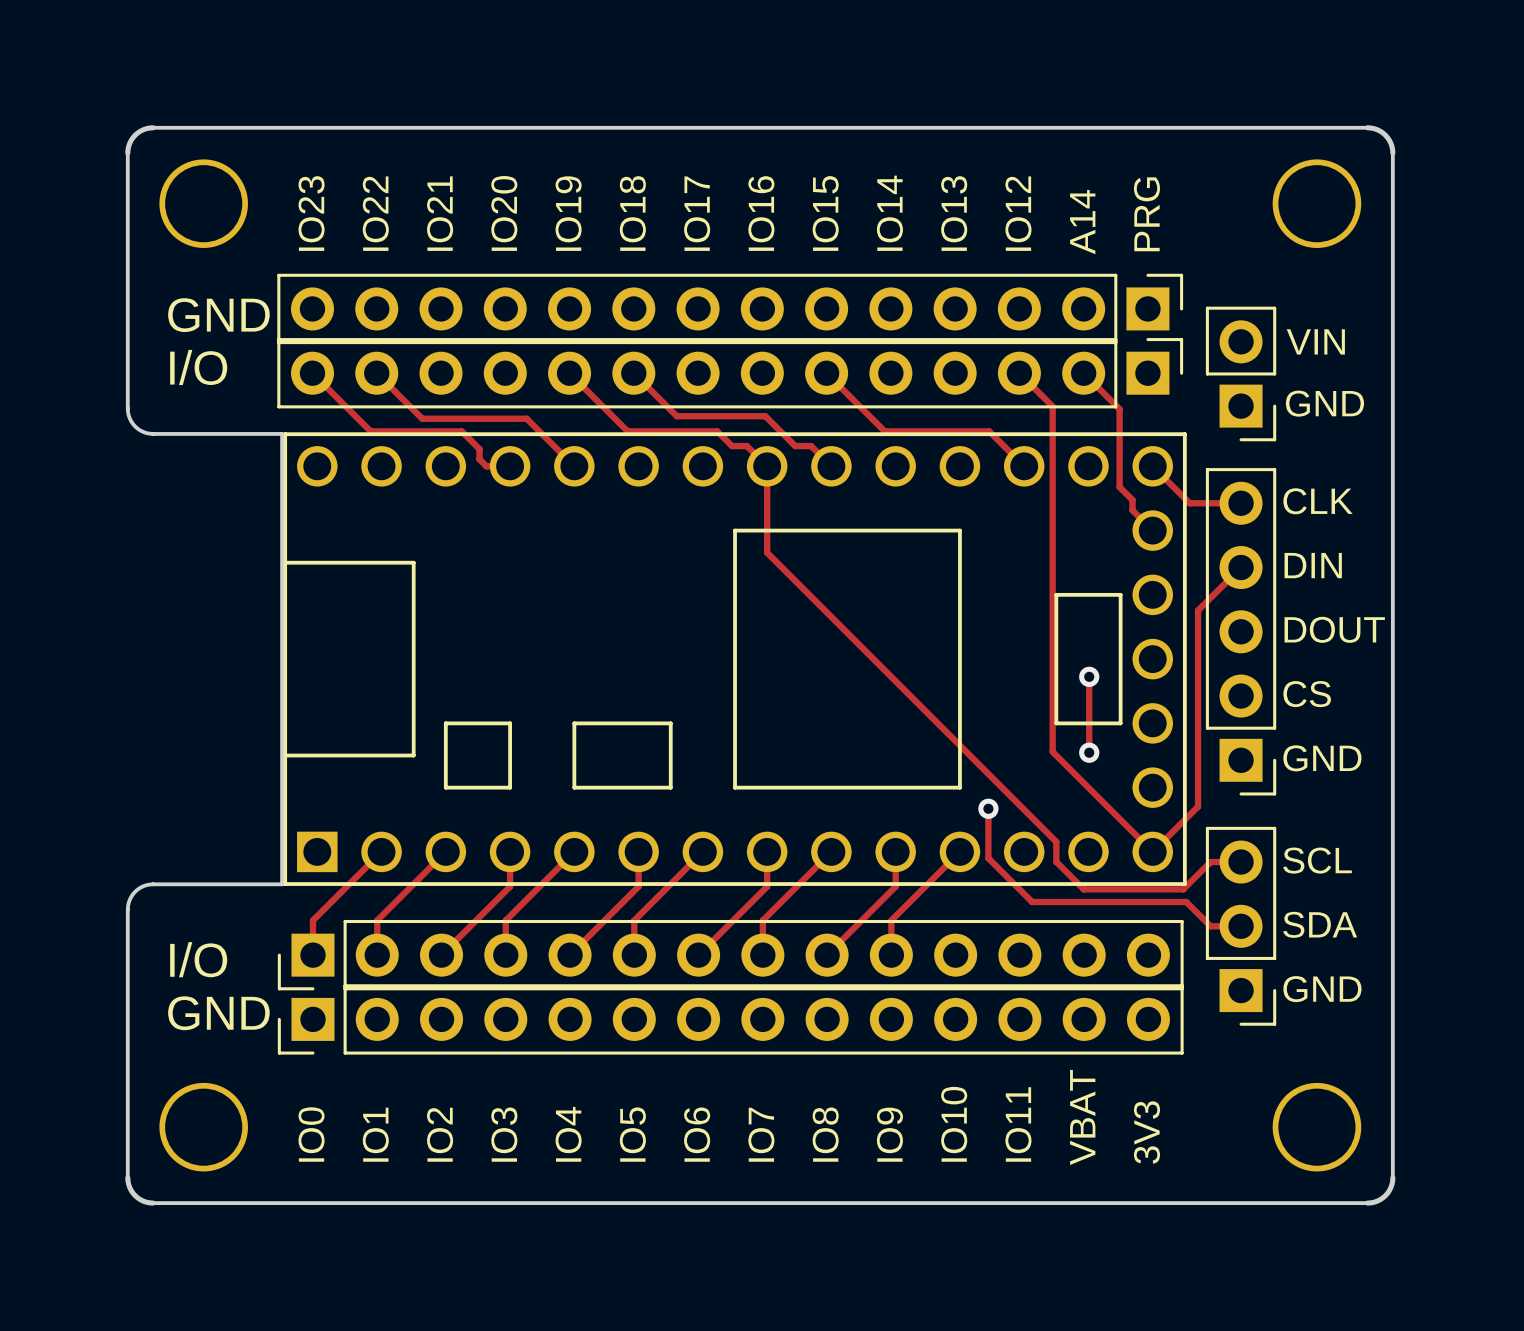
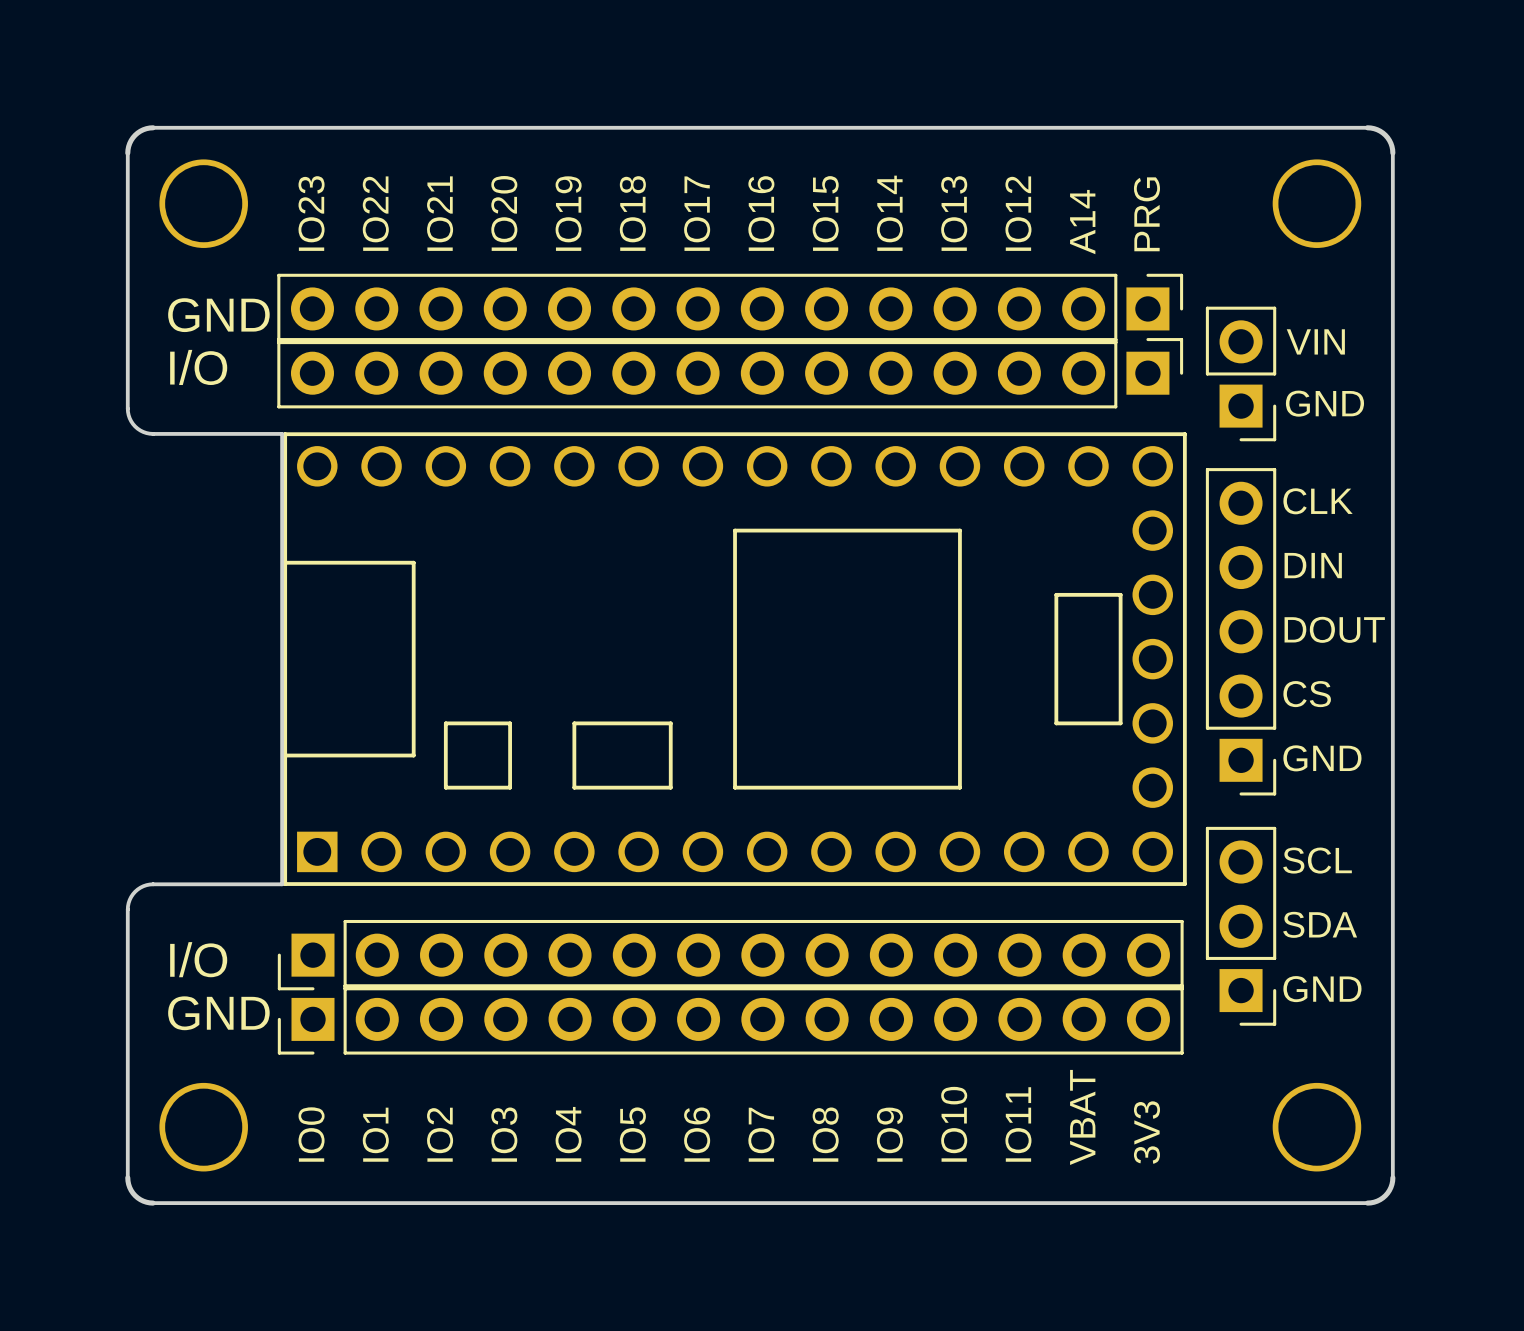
track: (312, 373) (370, 431) (461, 431) (479, 449) (479, 459) (486, 466) (510, 466) -> none
track: (376, 373) (422, 418) (526, 418) (574, 466) -> none
track: (569, 373) (627, 431) (717, 431) (731, 446) (746, 446) (767, 466) (767, 552) (1056, 841) (1056, 861) (1083, 889) (1183, 889) (1210, 862) (1241, 862) -> none
track: (633, 373) (676, 416) (765, 416) (795, 446) (811, 446) (831, 466) -> none
track: (826, 373) (884, 431) (989, 431) (1024, 466) -> none
track: (1019, 373) (1052, 406) (1052, 751) (1152, 851) (1198, 806) (1198, 610) (1241, 567) -> none
track: (1083, 373) (1119, 409) (1119, 487) (1132, 499) (1132, 510) (1152, 530) -> none
track: (1152, 466) (1189, 503) (1241, 503) -> none
track: (1089, 676) (1089, 752) -> none
via: (1089, 676) -> none
via: (1089, 752) -> none
track: (988, 808) (988, 858) (1032, 902) (1186, 902) (1210, 926) (1241, 926) -> none
via: (988, 808) -> none
track: (381, 851) (312, 920) (312, 955) -> none
track: (445, 851) (377, 920) (377, 955) -> none
track: (510, 851) (510, 886) (441, 955) -> none
track: (574, 851) (505, 920) (505, 955) -> none
track: (638, 851) (638, 886) (570, 955) -> none
track: (702, 851) (634, 920) (634, 955) -> none
track: (767, 851) (767, 886) (698, 955) -> none
track: (831, 851) (762, 920) (762, 955) -> none
track: (895, 851) (895, 886) (827, 955) -> none
track: (959, 851) (891, 920) (891, 955) -> none

